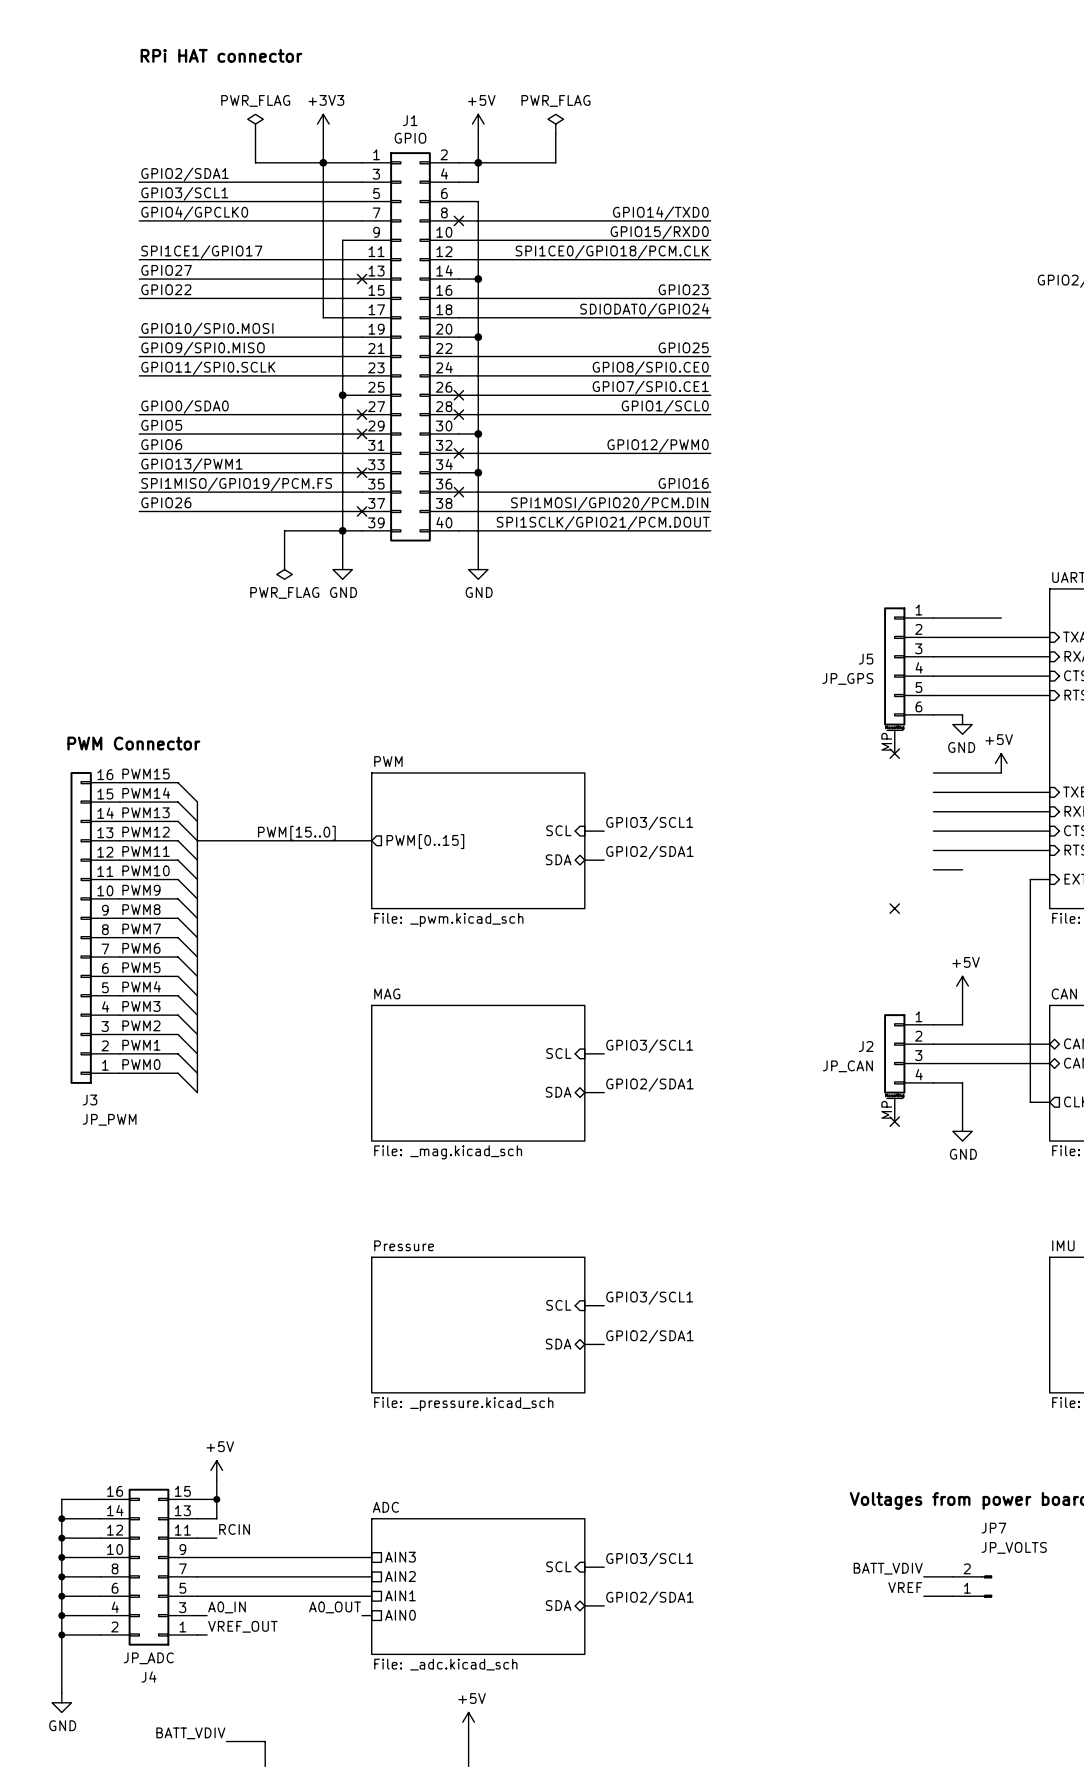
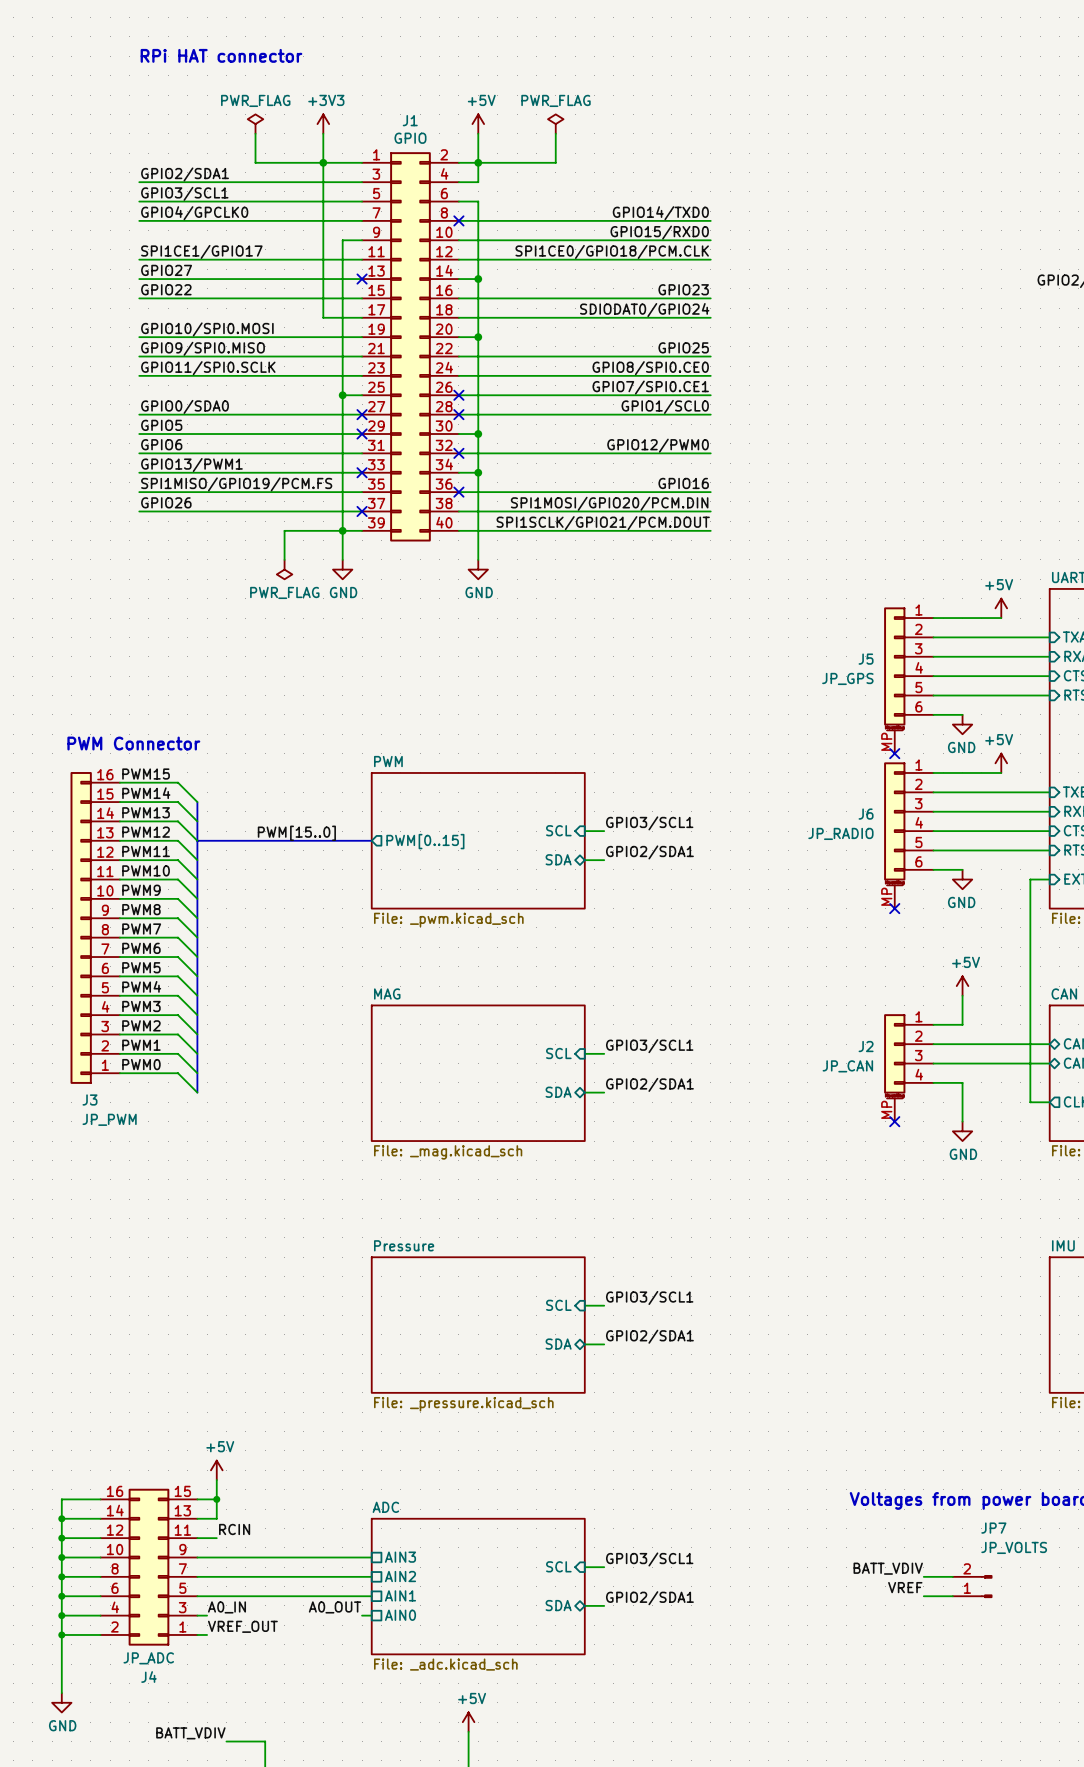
power symbol: none -> +5V (1001, 608)
J6: none -> JP_RADIO (908, 835)
power symbol: none -> GND (962, 879)

